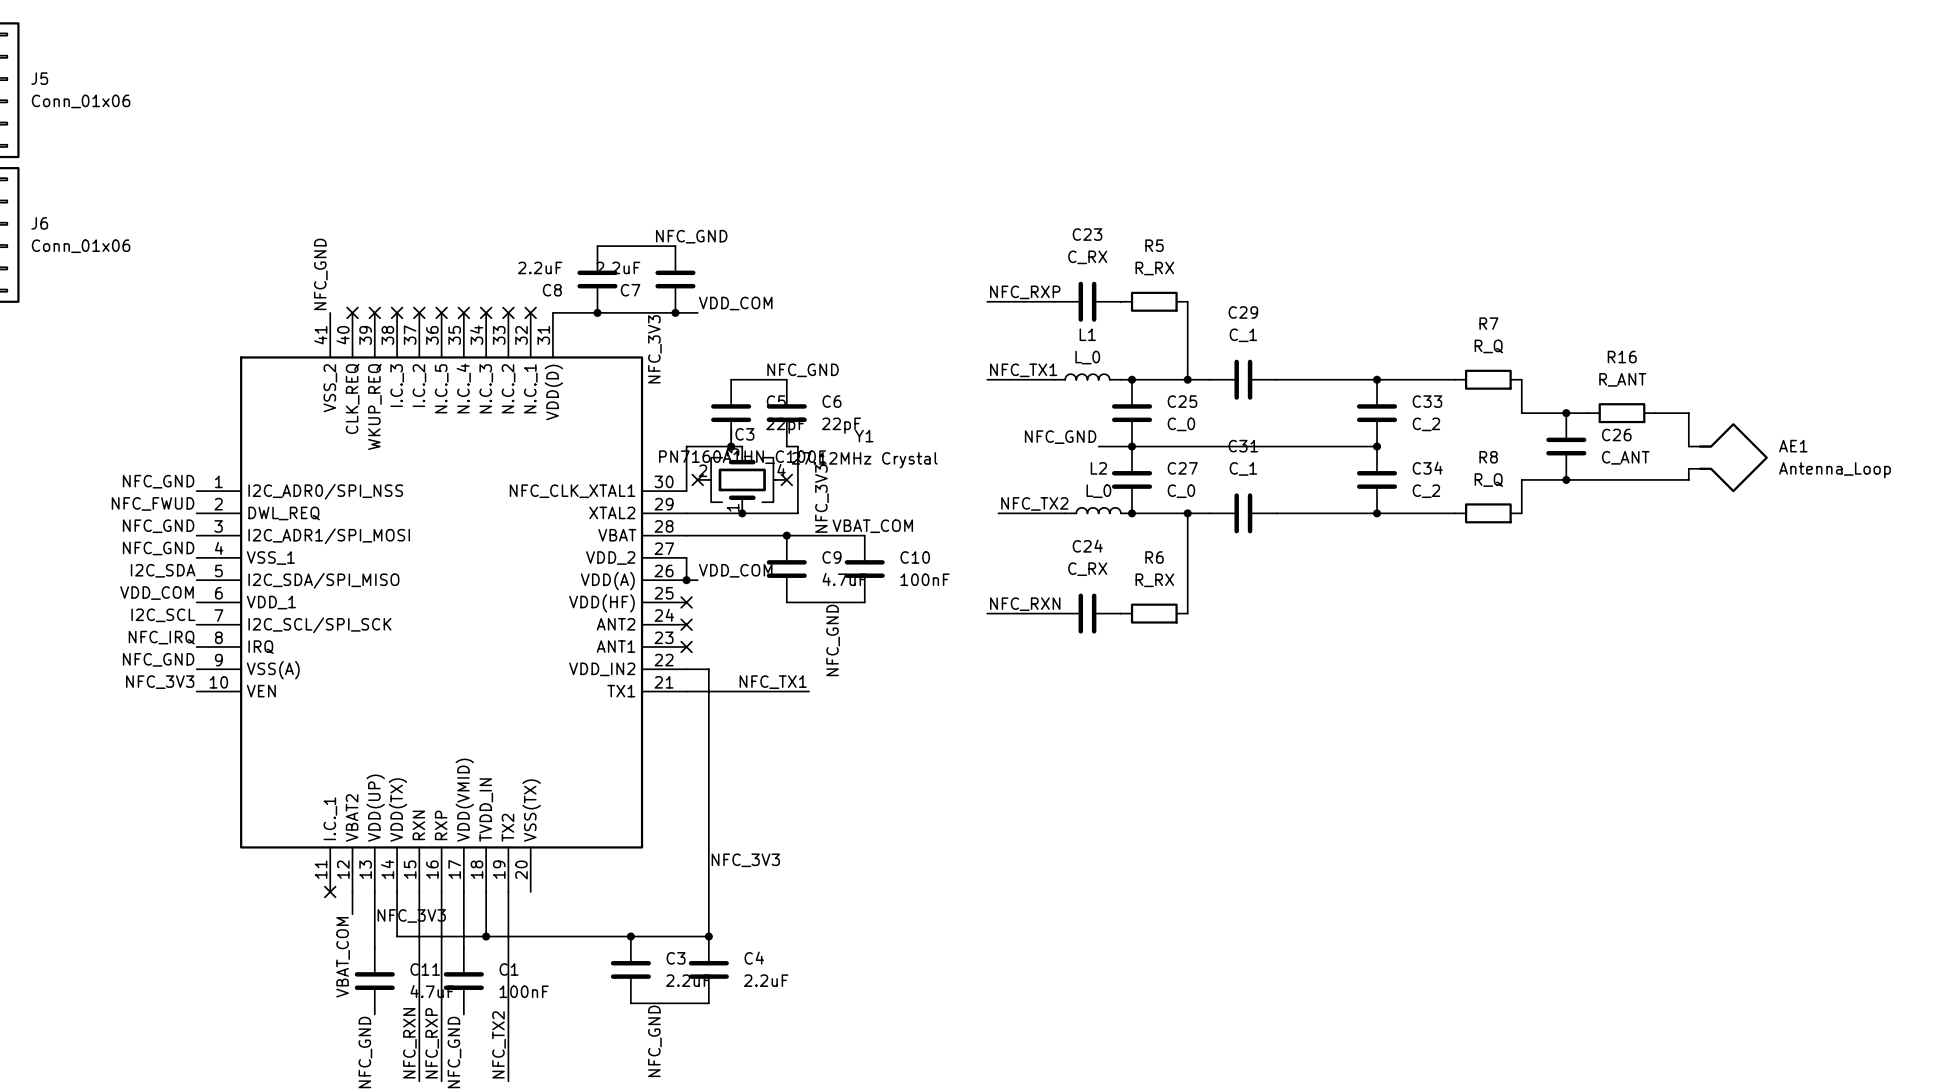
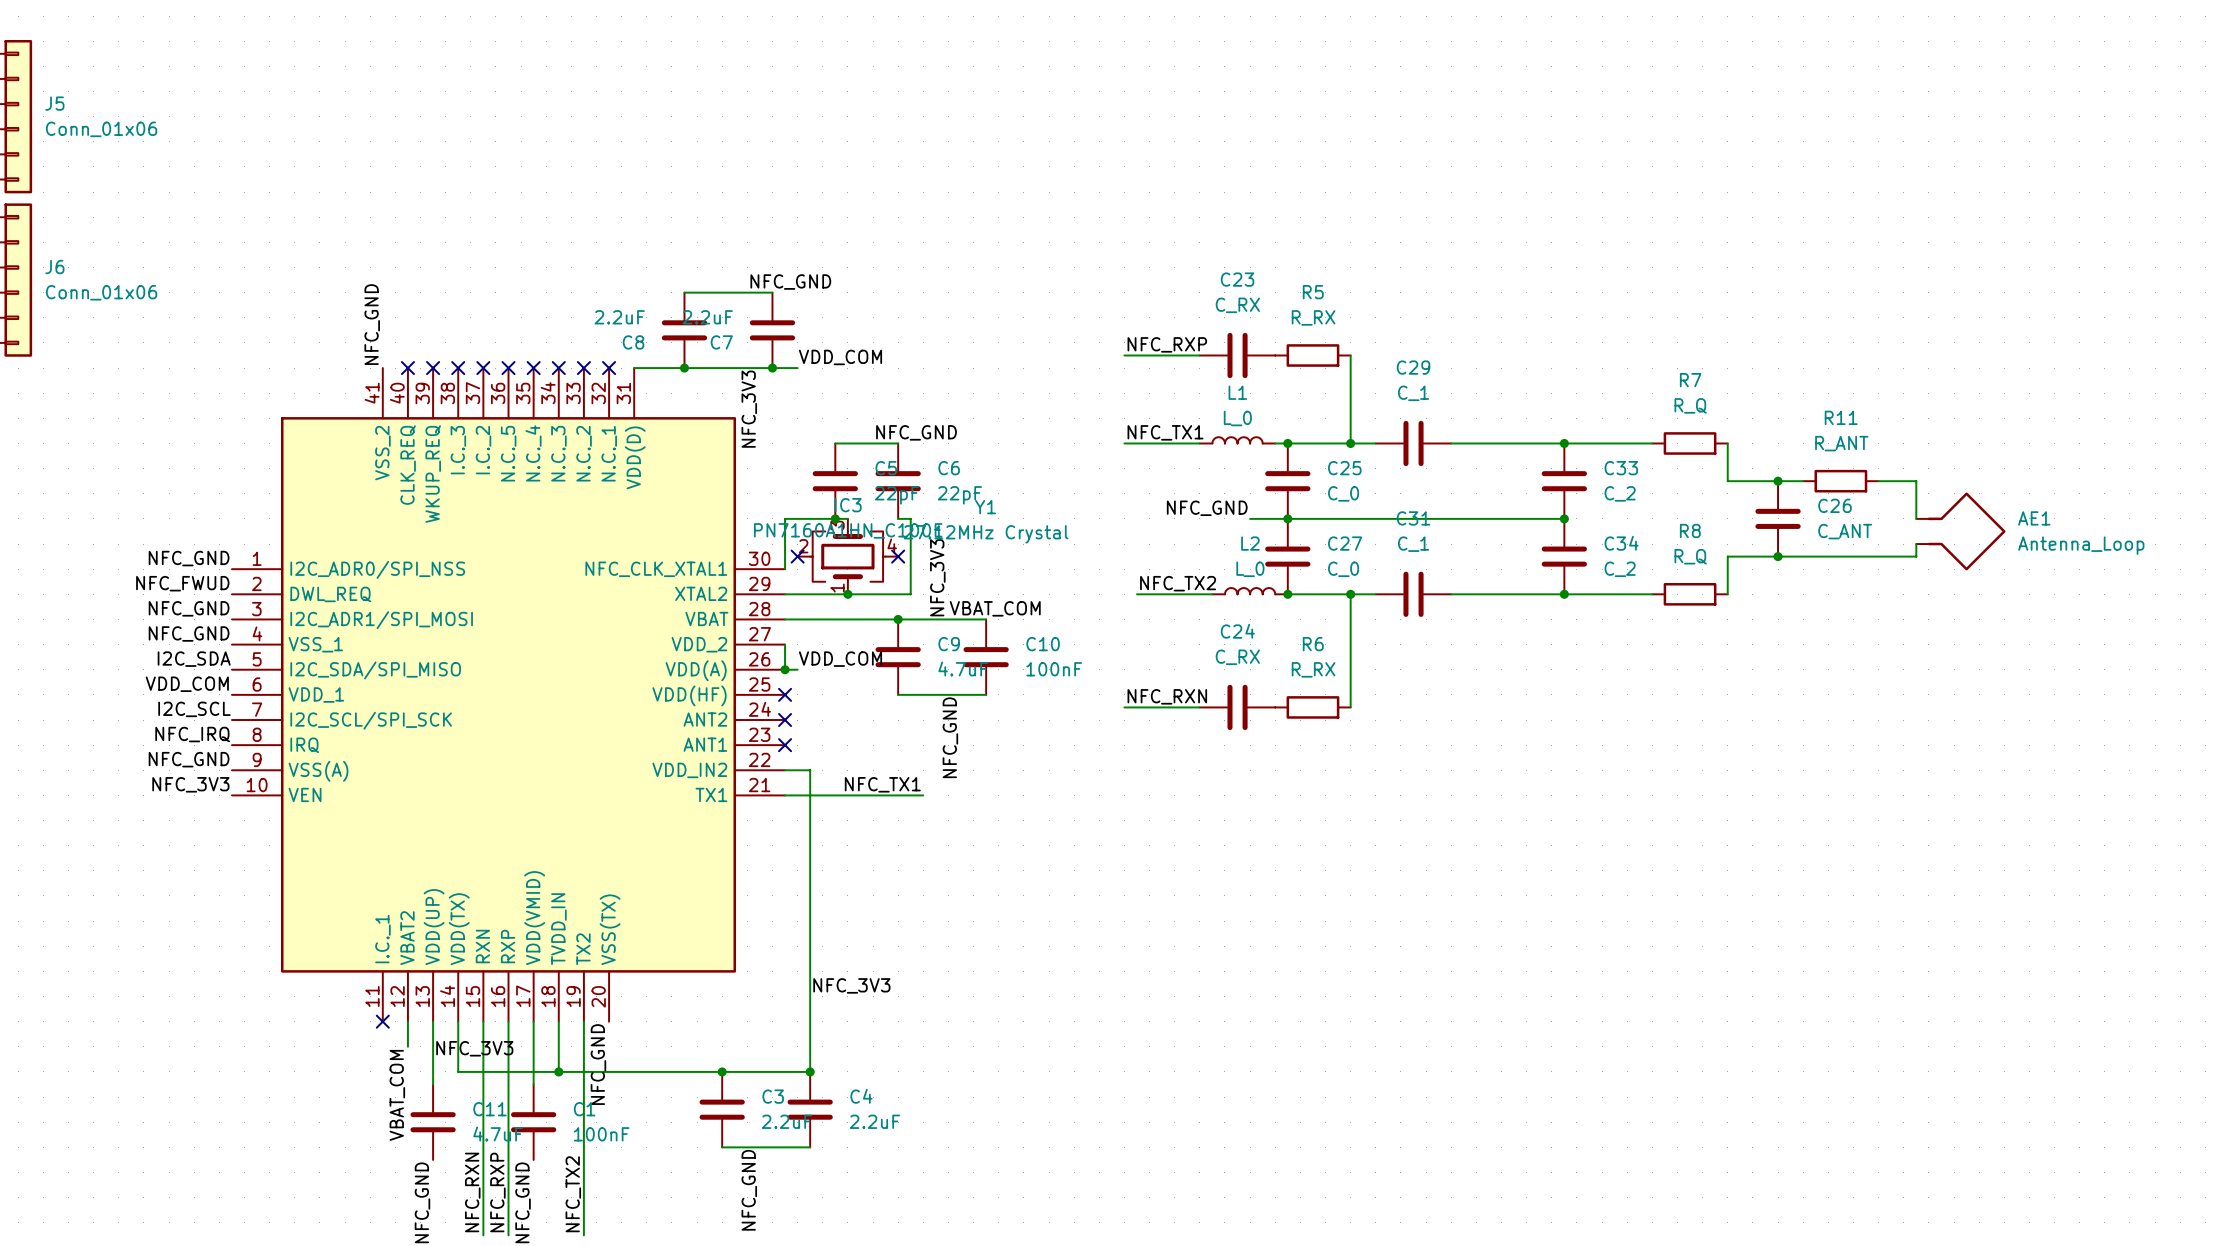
R16 name: R16 (1622, 357) -> R11 (1841, 417)
label: none -> NFC_GND (598, 1064)

